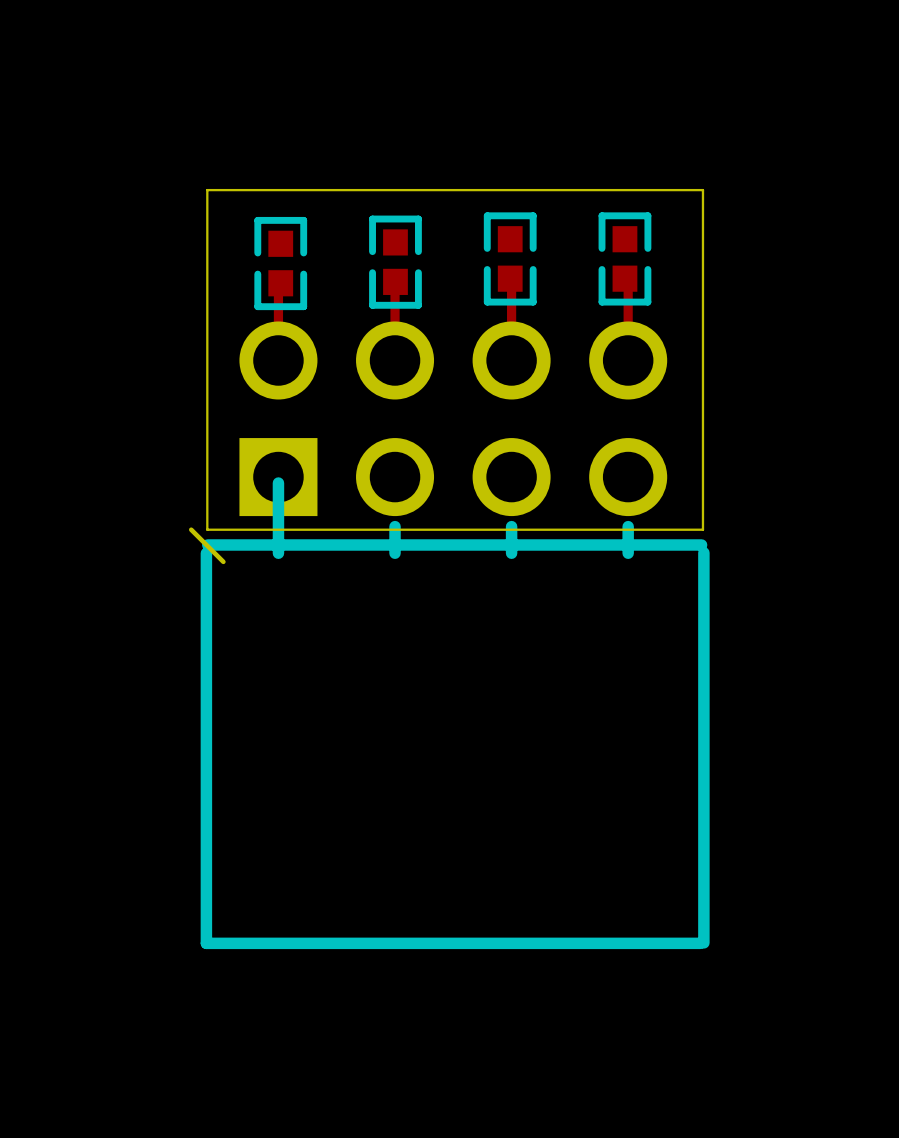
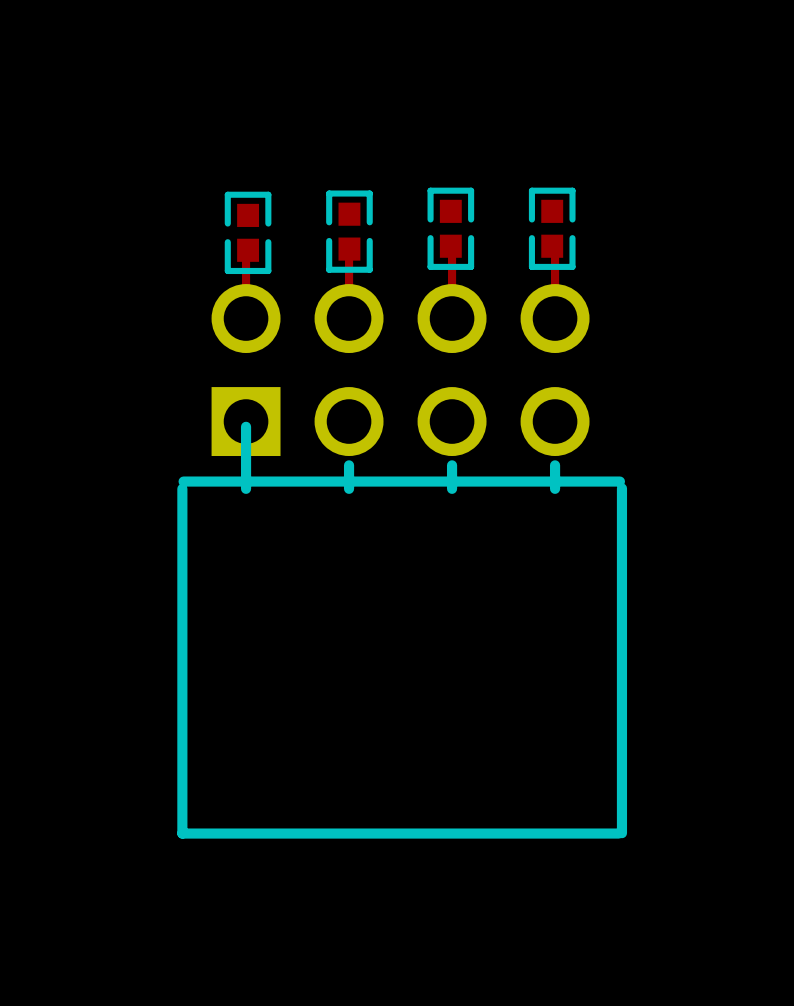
board edge: (207, 190) (702, 190) (702, 529) (207, 529) (207, 190) -> none
board edge: (191, 529) (223, 561) -> none

